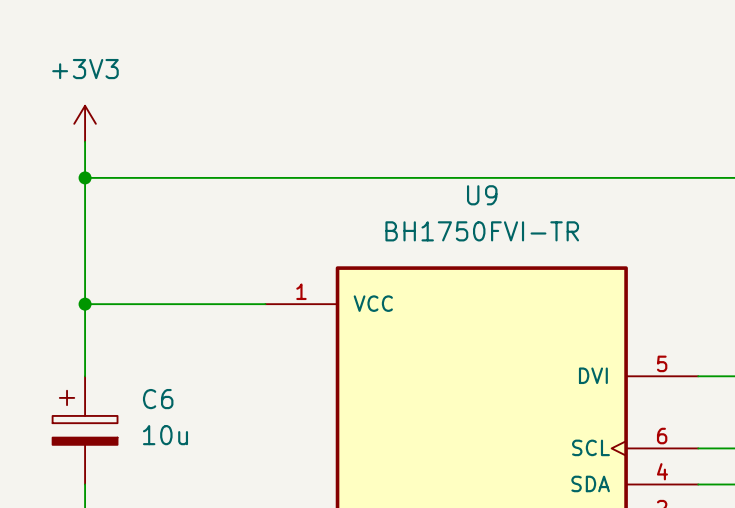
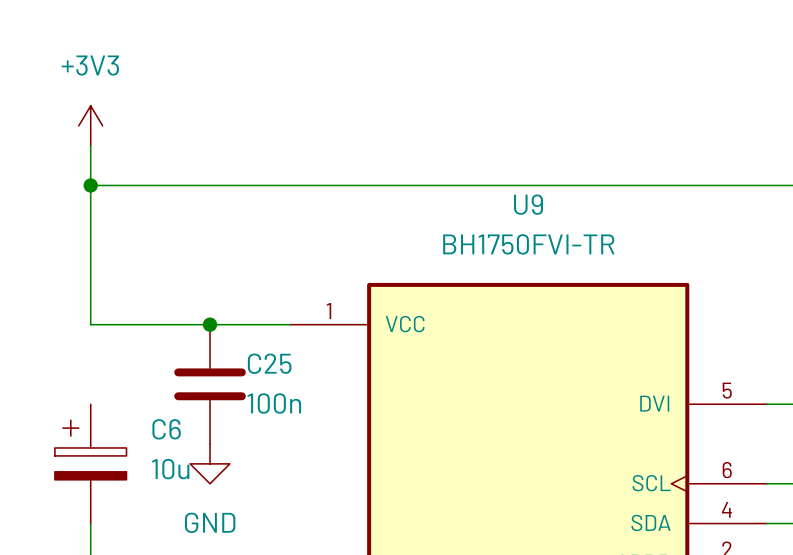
wire: (85, 304) (85, 376) -> none
junction: (85, 304) -> none
junction: none -> (210, 324)
C25: none -> 100n (210, 384)
power symbol: none -> GND (210, 463)

